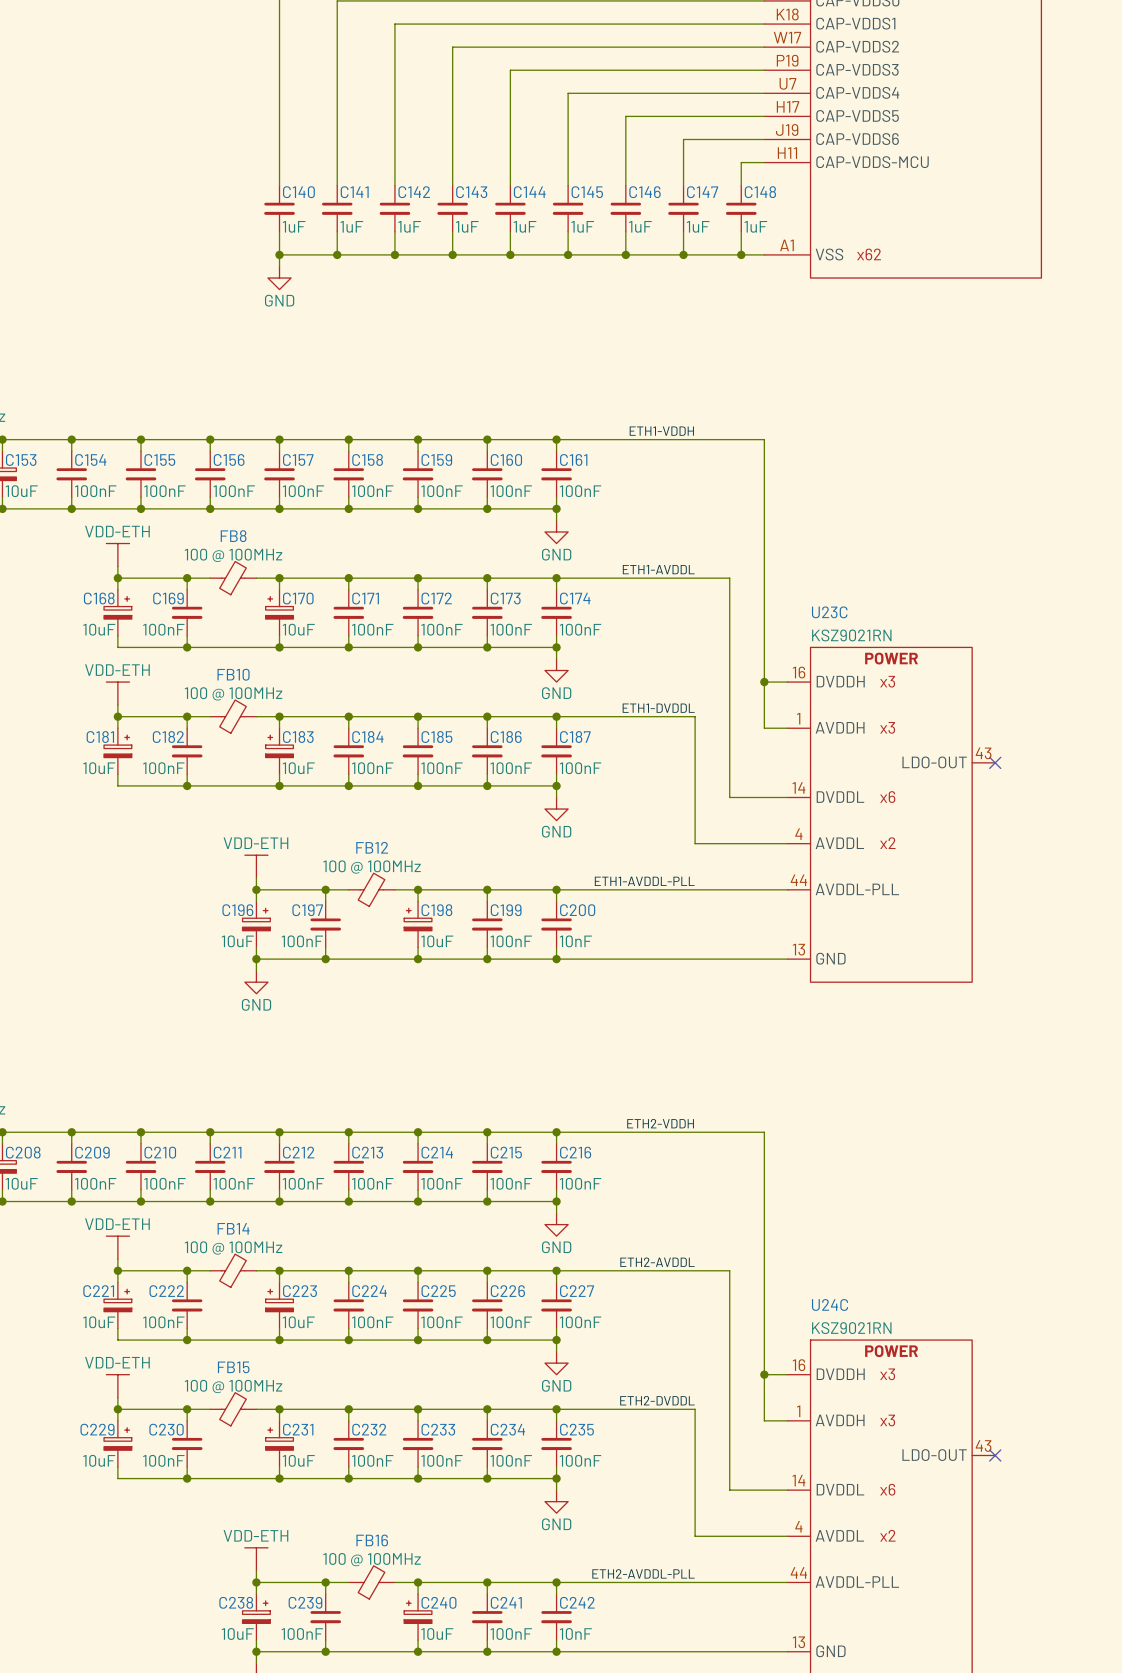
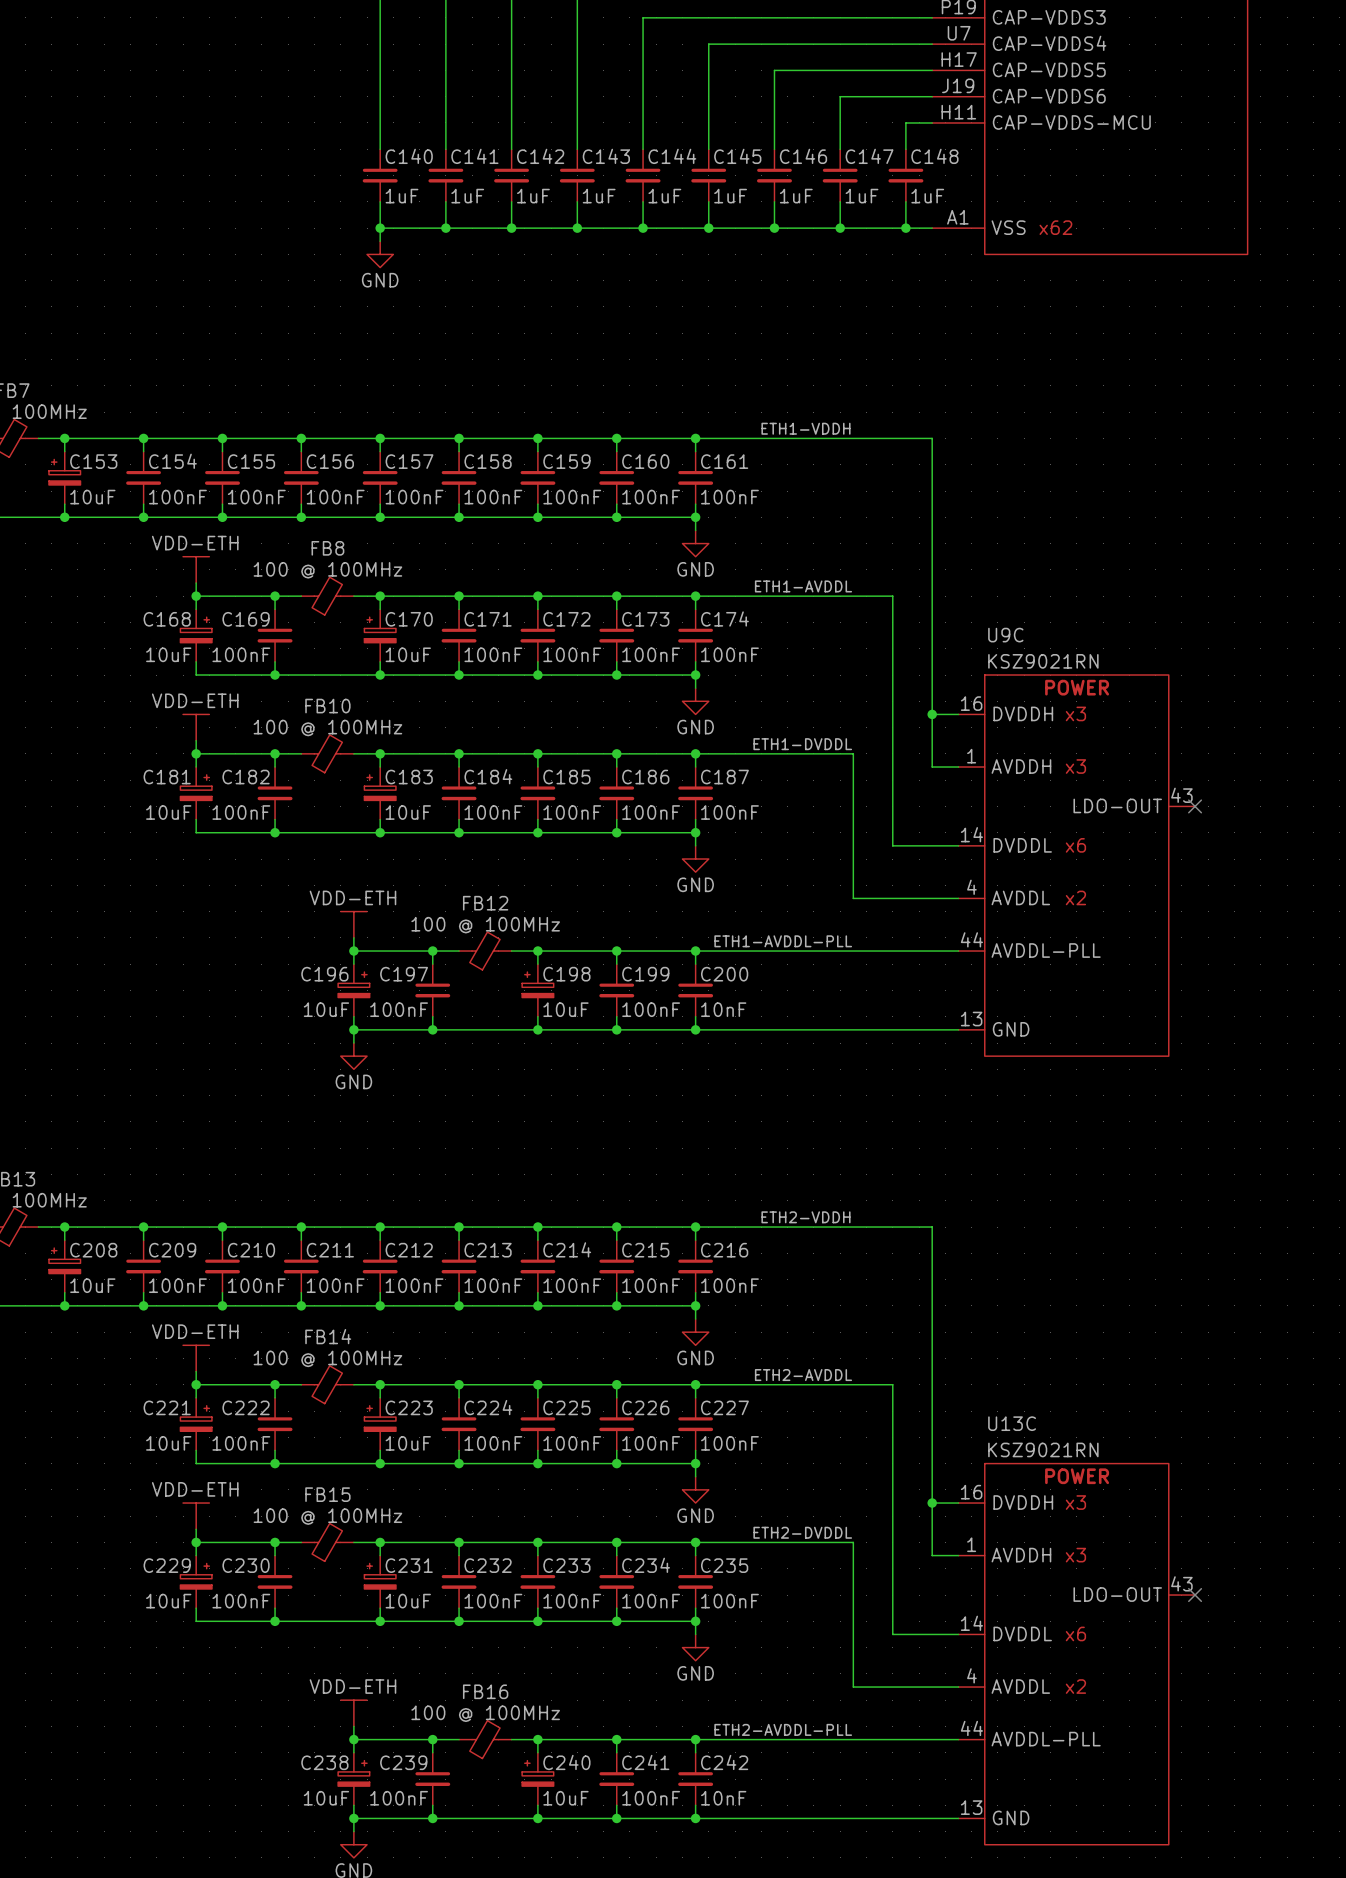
U23C name: U23C (829, 612) -> U9C (1005, 635)
U24C name: U24C (830, 1304) -> U13C (1012, 1423)

